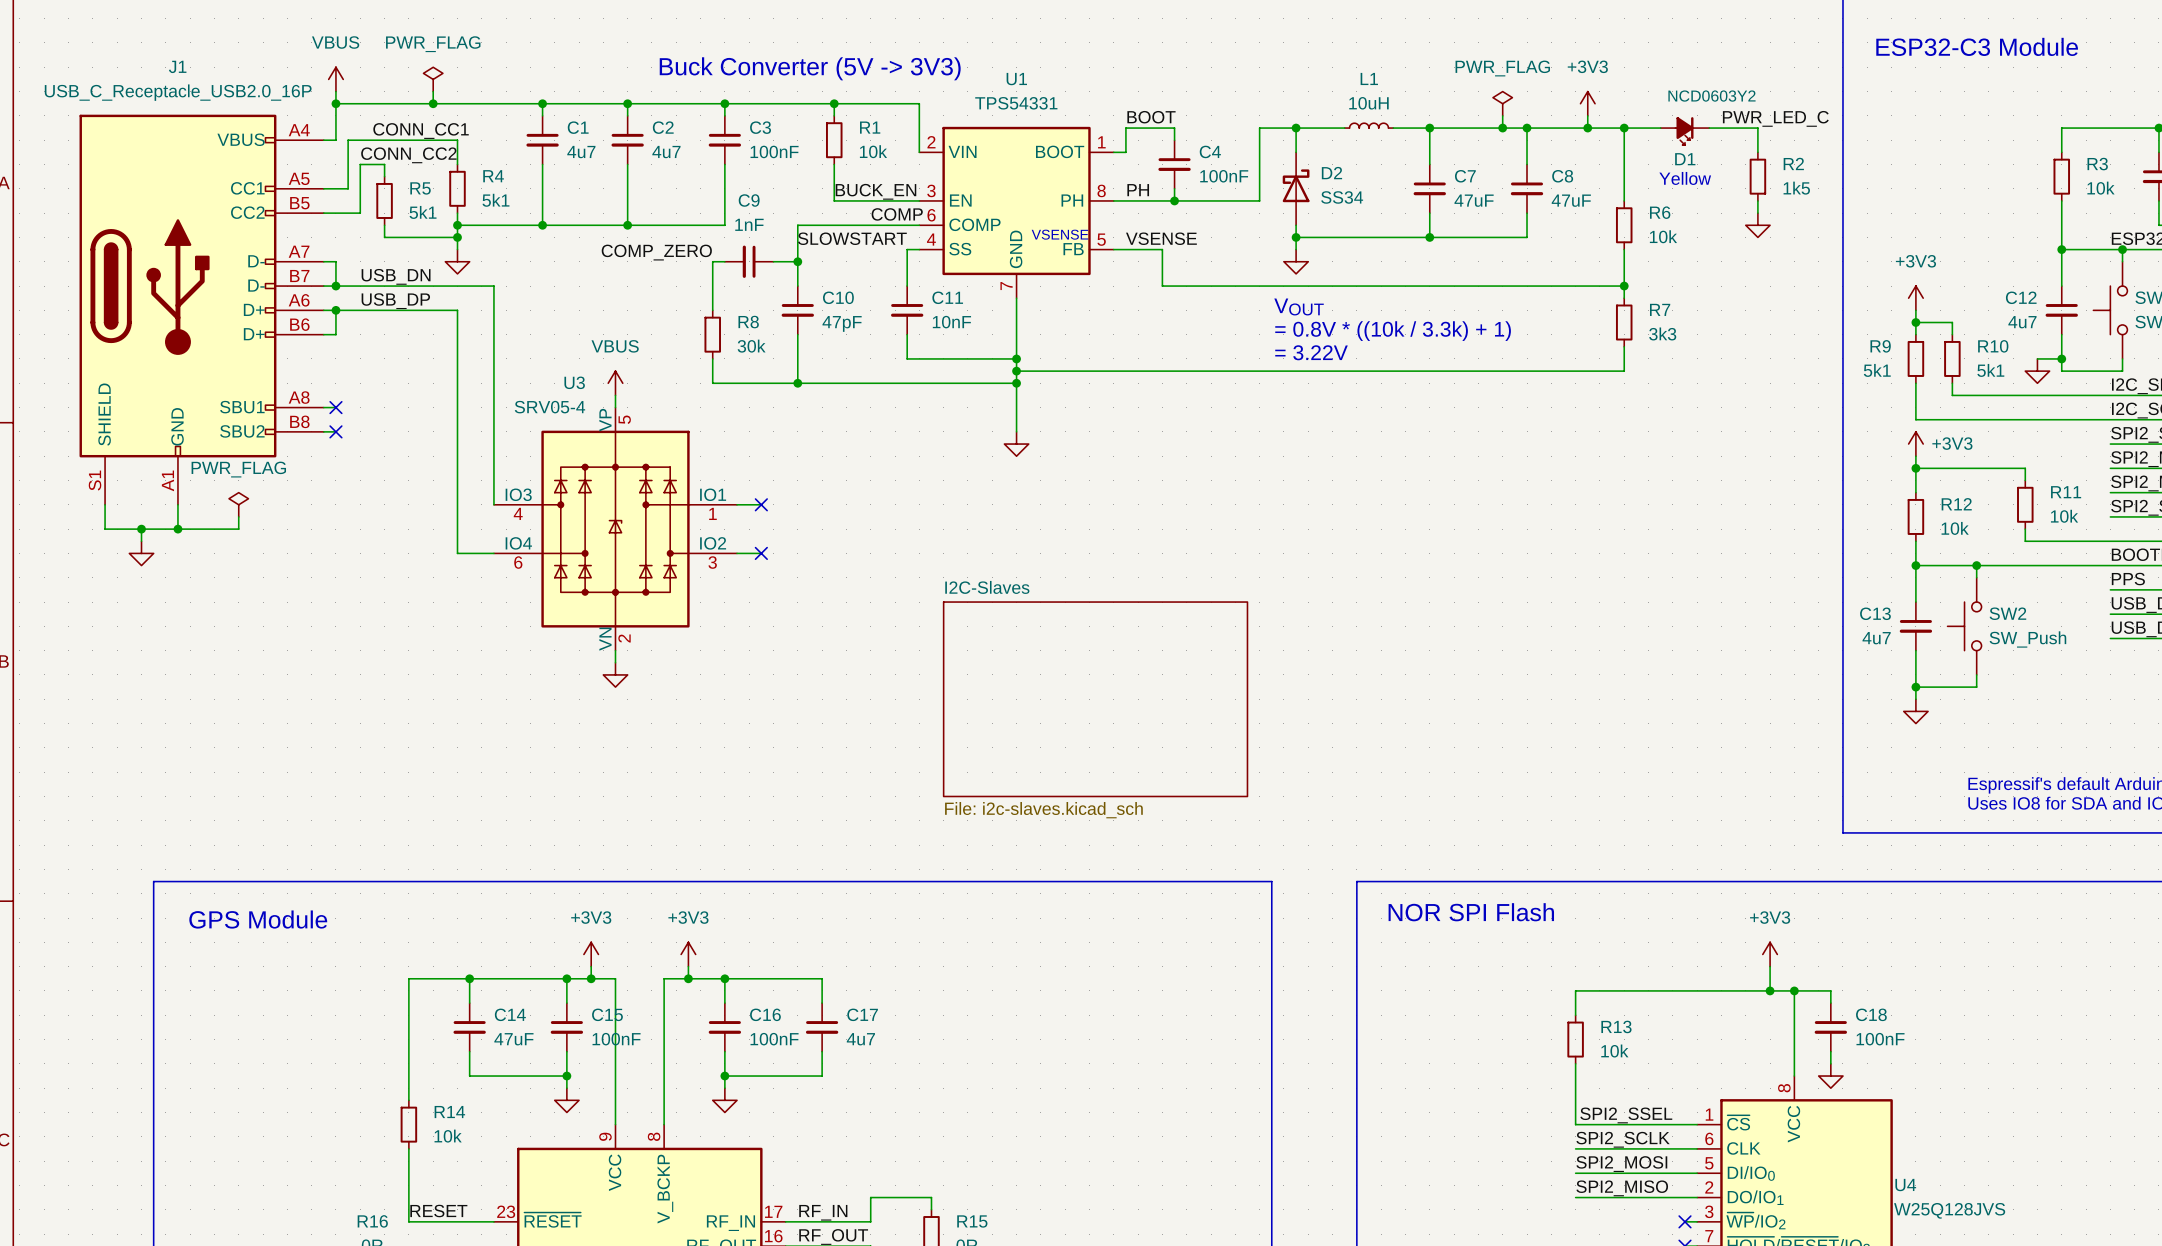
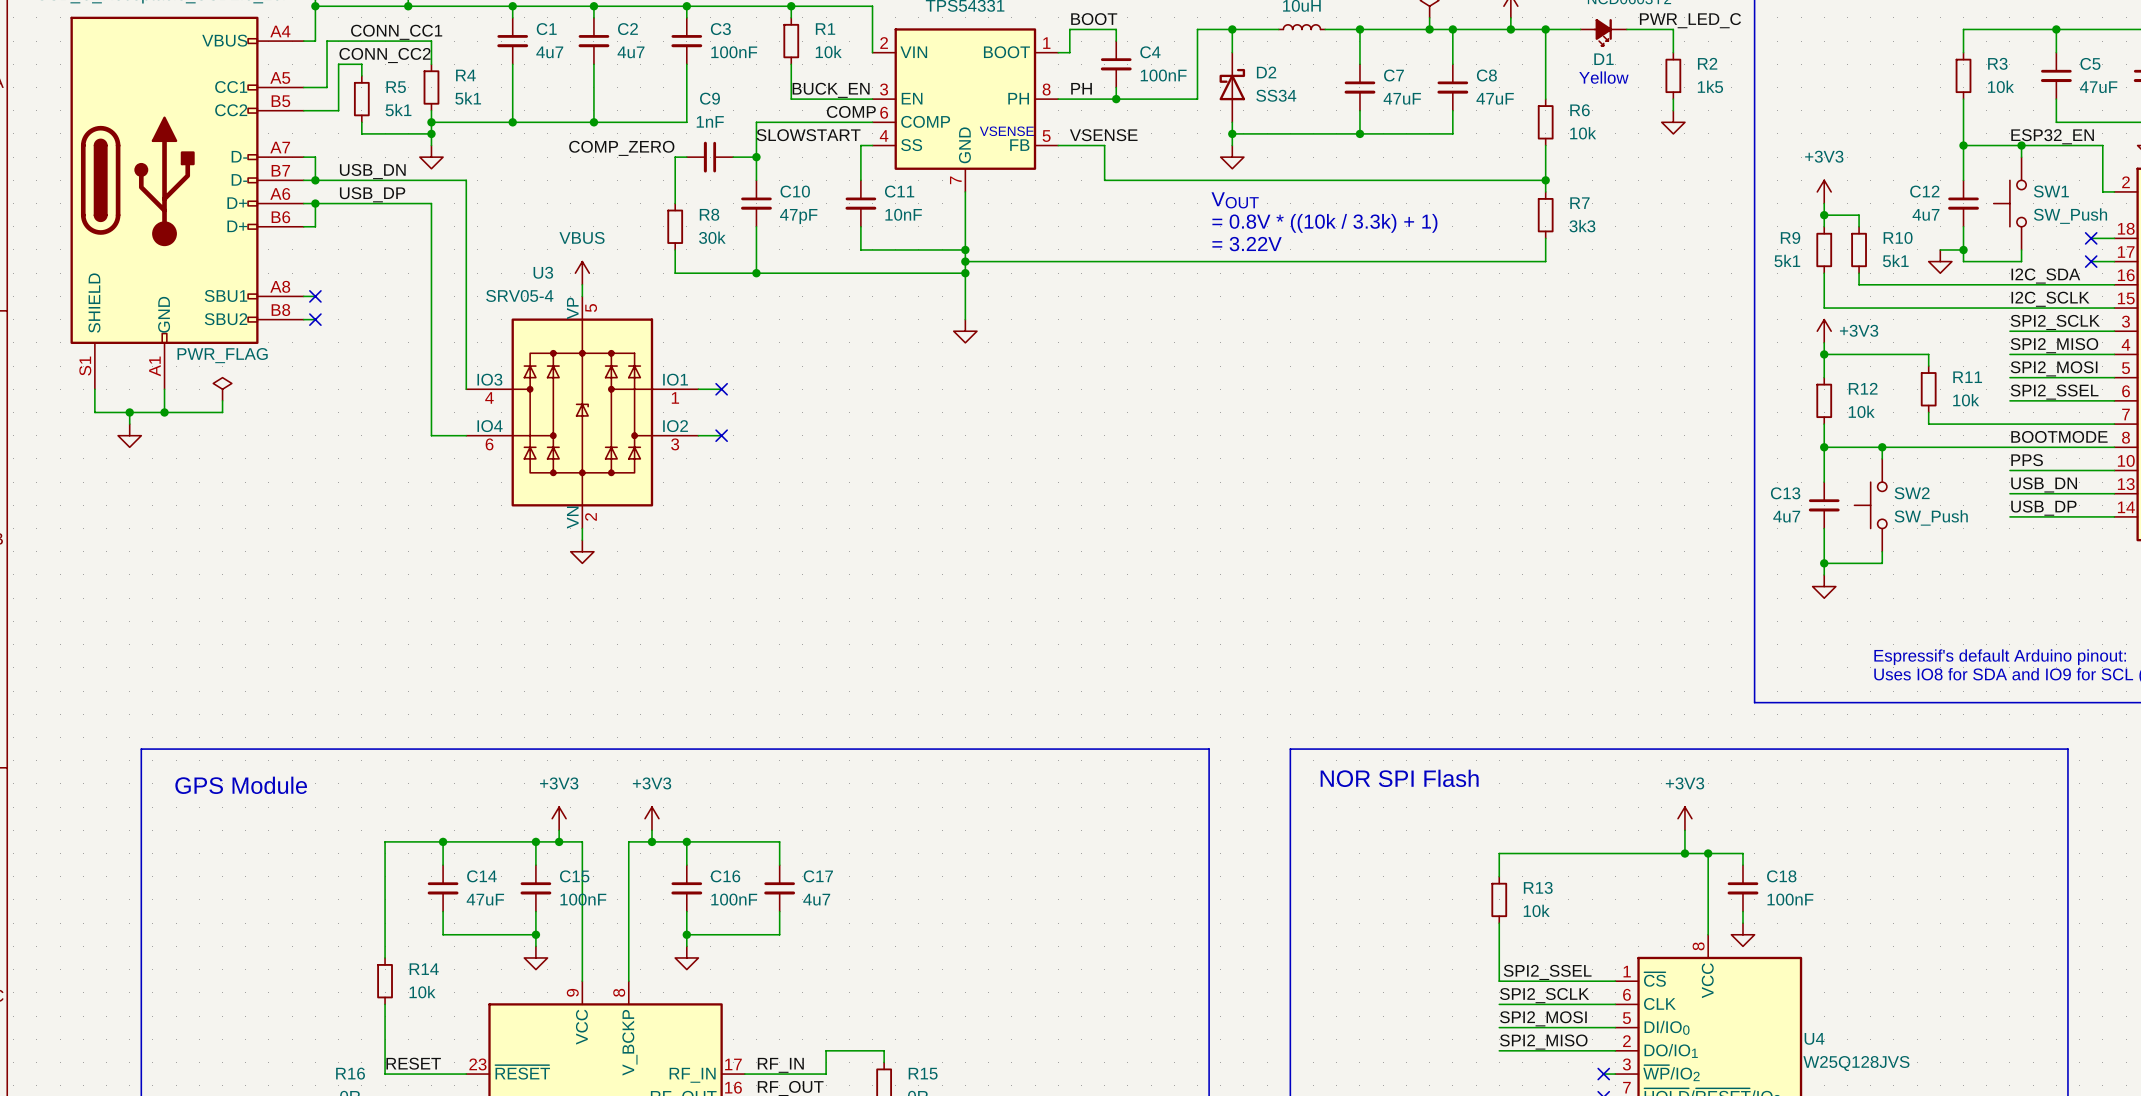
sheet I2C-Slaves: File: i2c-slaves.kicad_sch (1095, 699) -> none

